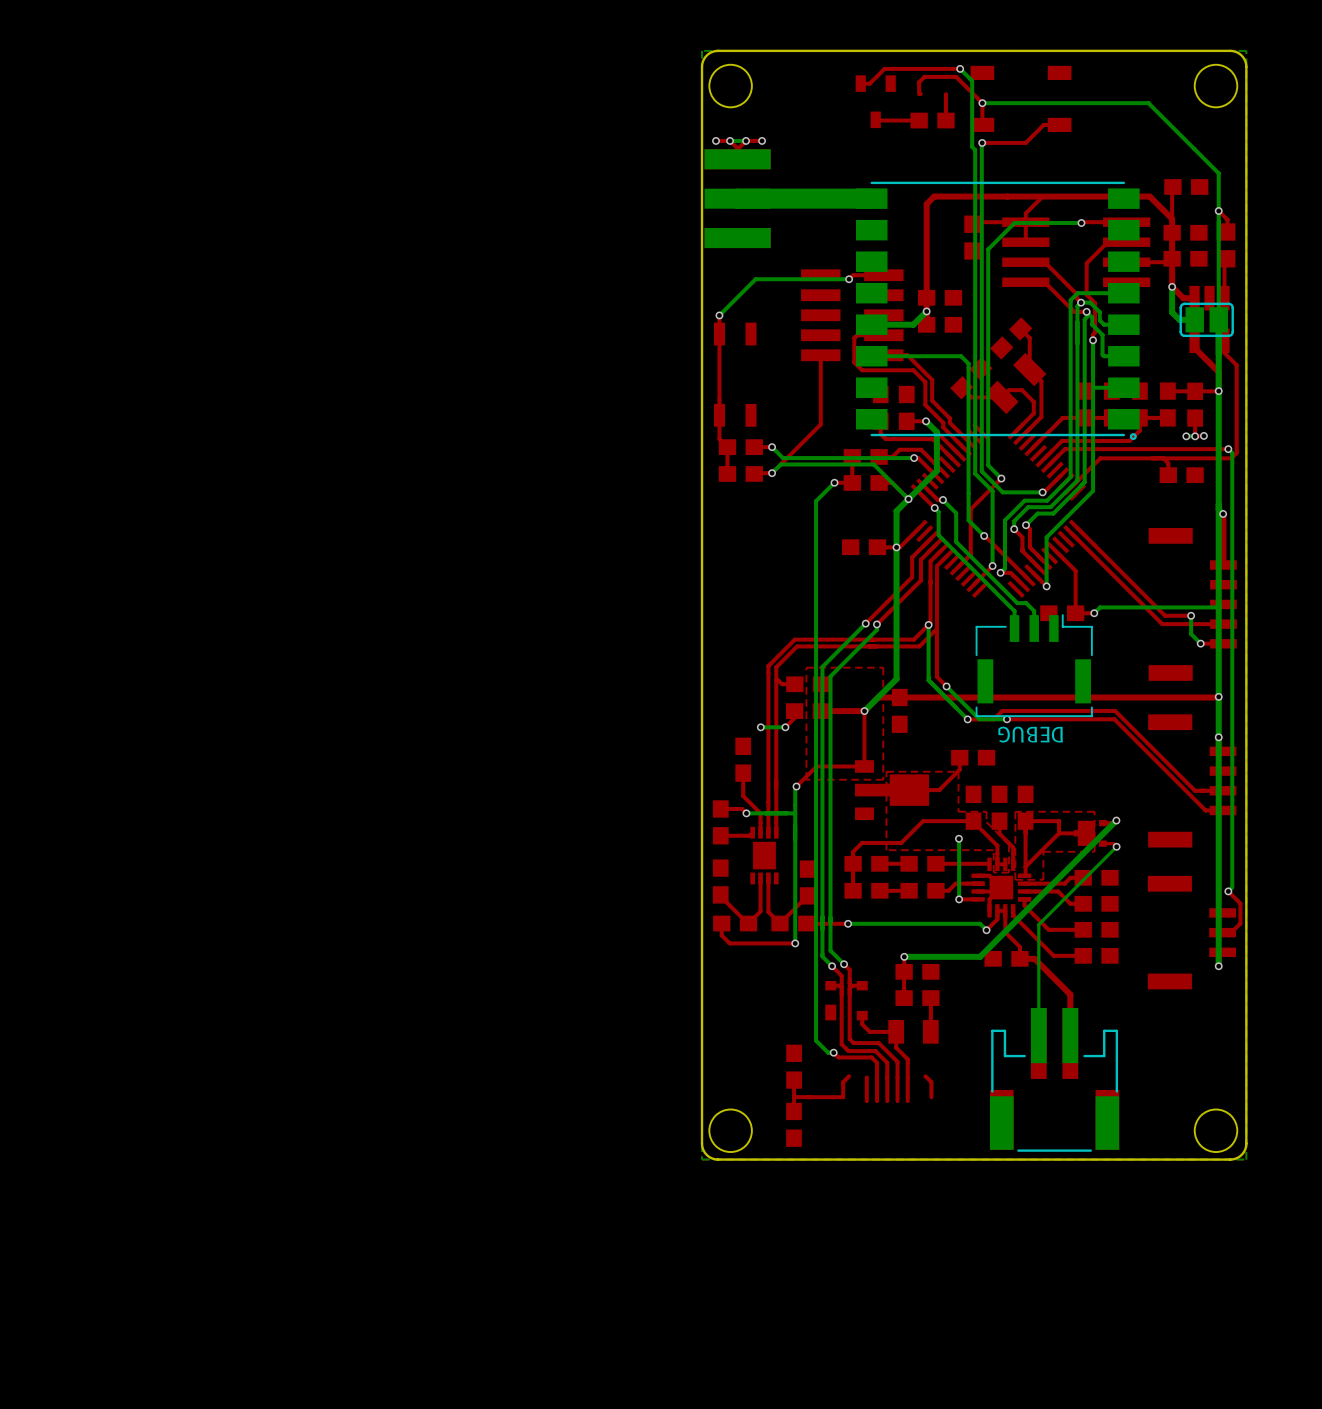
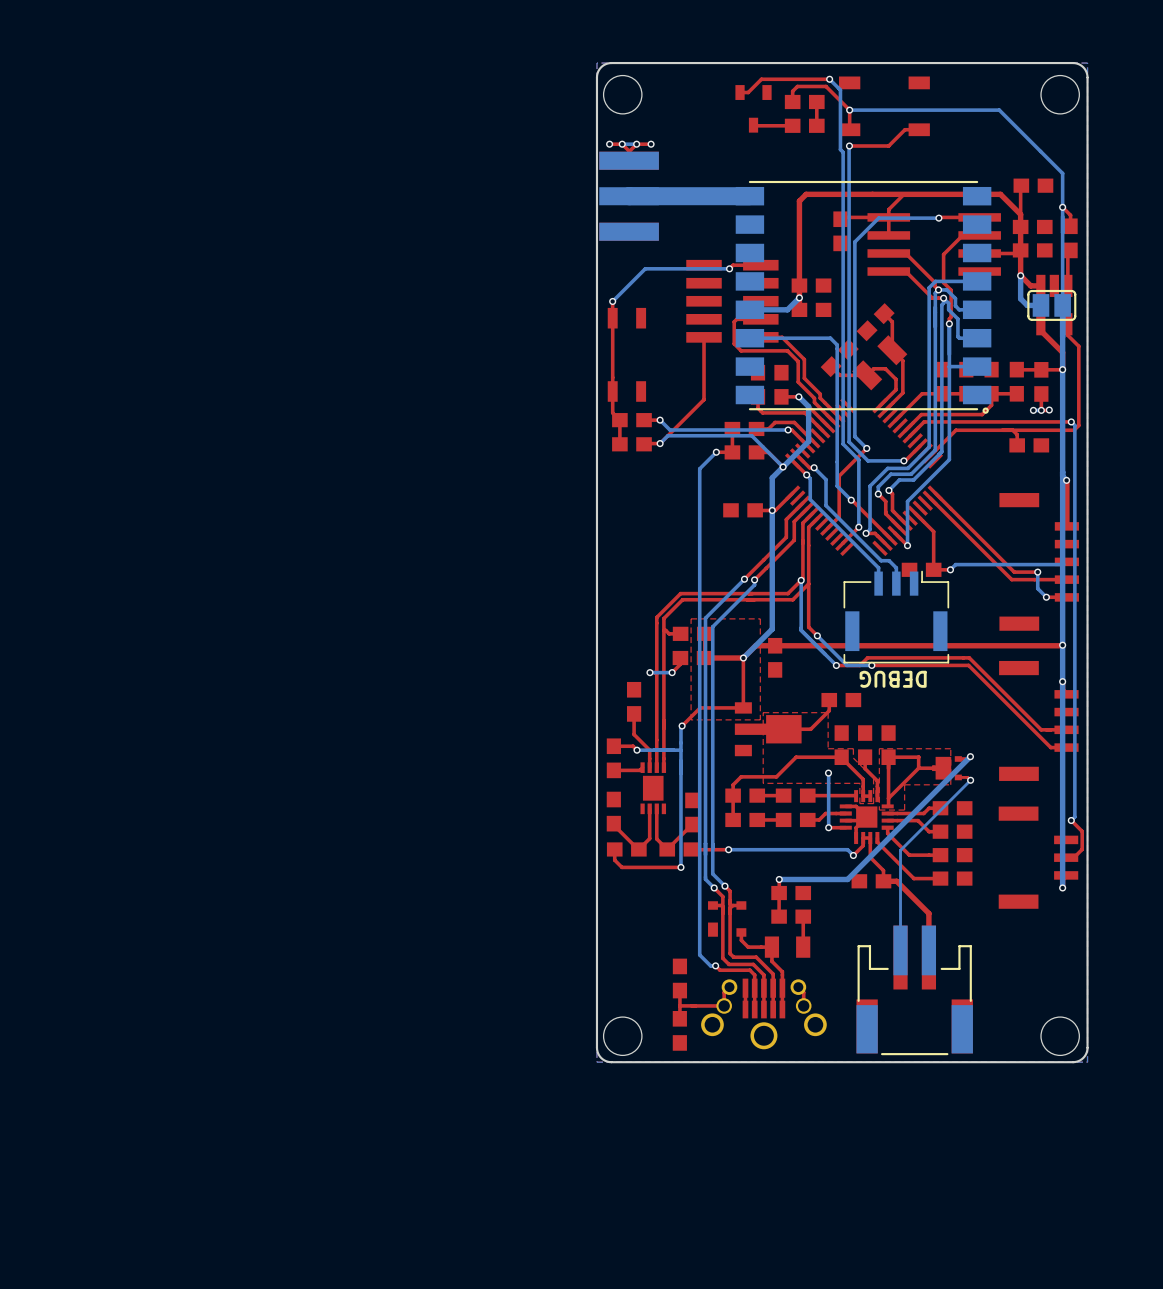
part: none -> (804, 101)
part: none -> (763, 1013)

